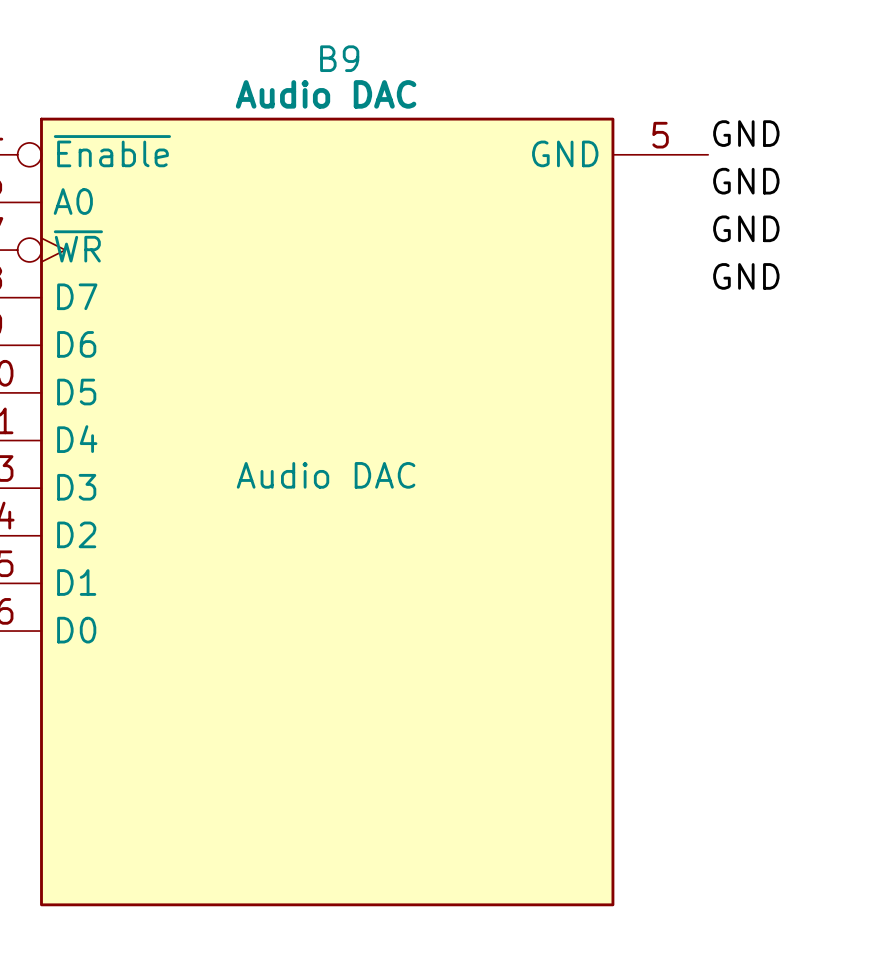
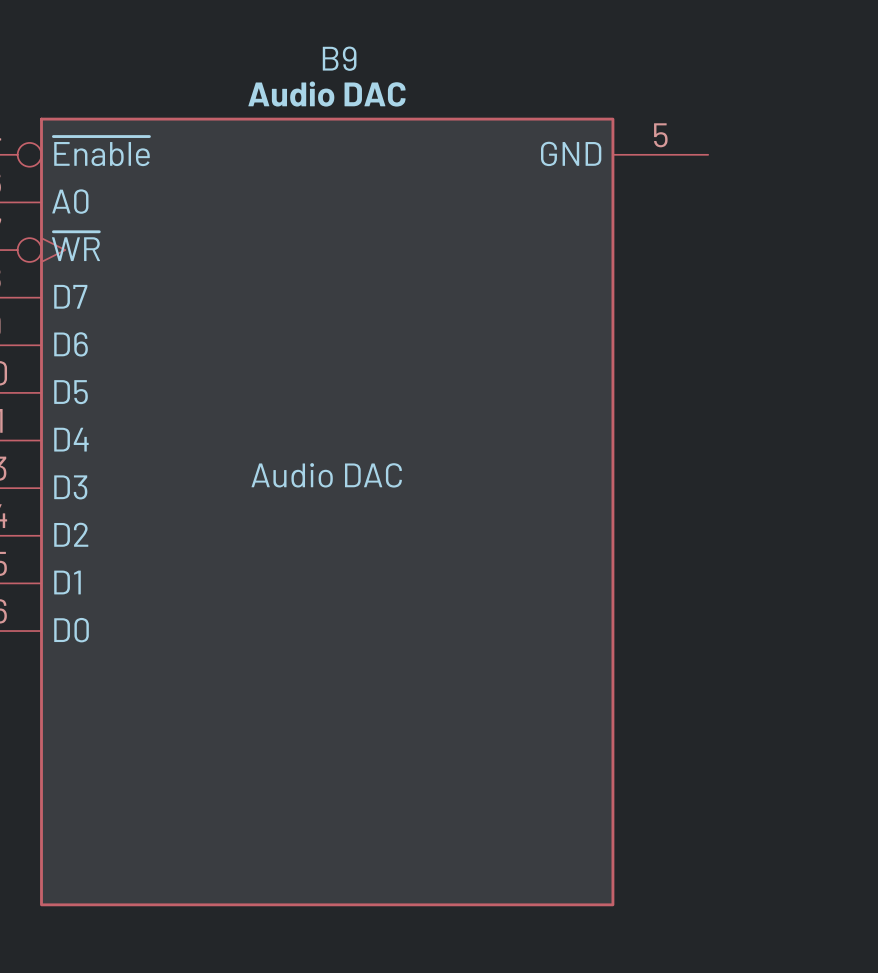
label: GND (746, 133) -> none
label: GND (746, 181) -> none
label: GND (746, 228) -> none
label: GND (746, 276) -> none

